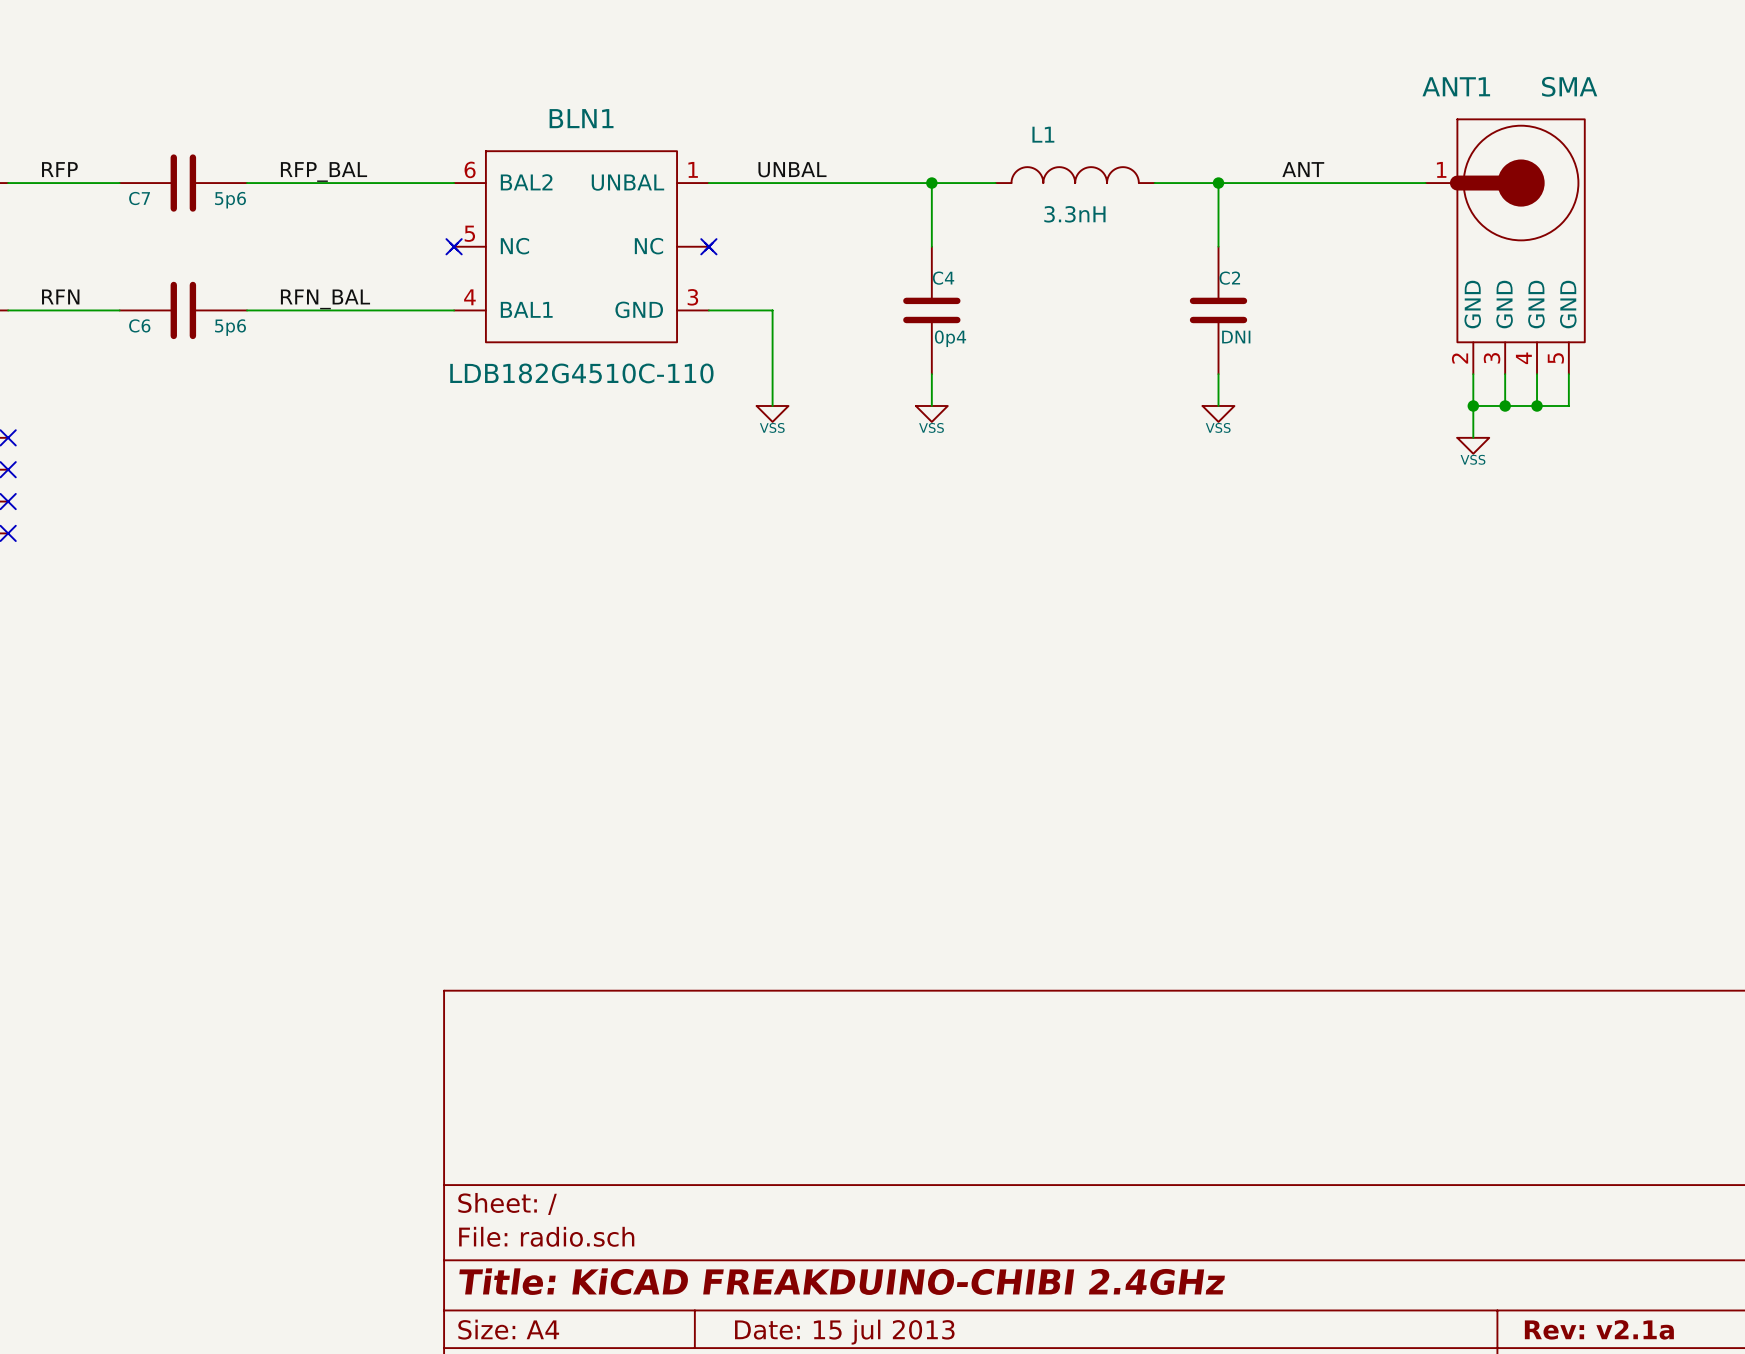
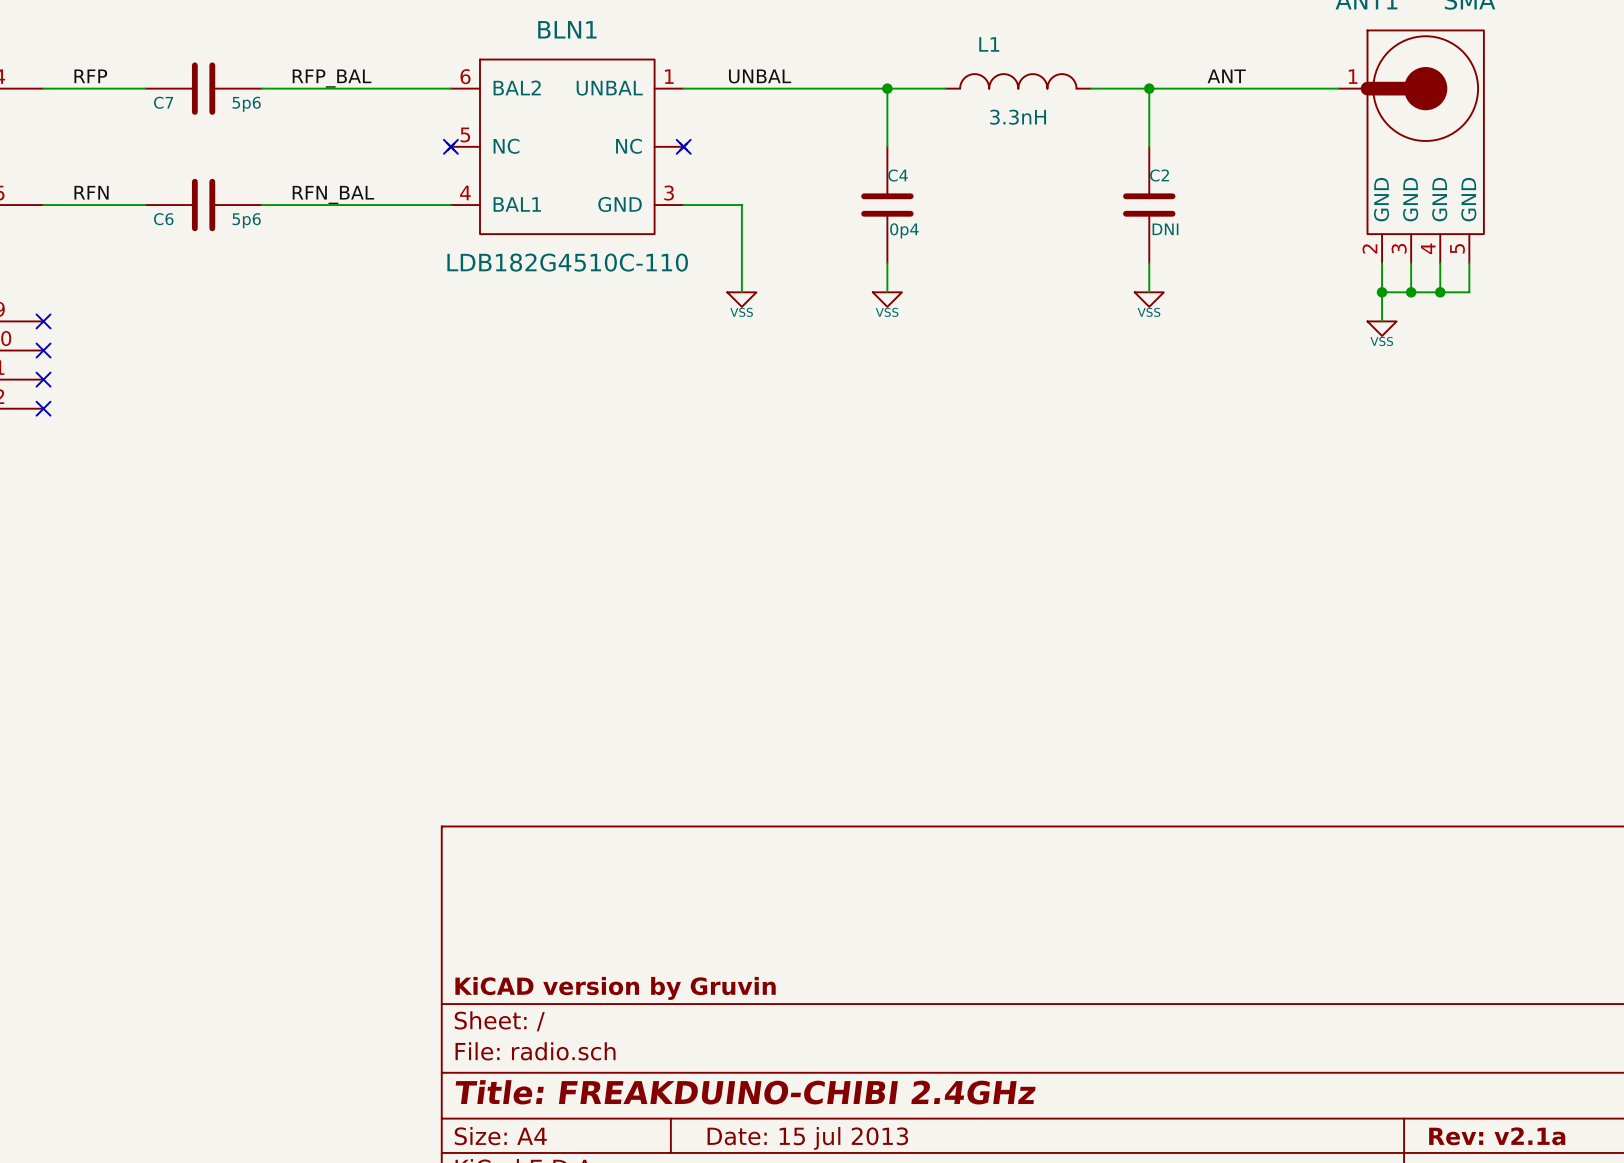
title block: none -> KiCAD version by Gruvin (615, 988)
title block: Title: KiCAD FREAKDUINO-CHIBI 2.4GHz (842, 1281) -> Title: FREAKDUINO-CHIBI 2.4GHz (745, 1092)

